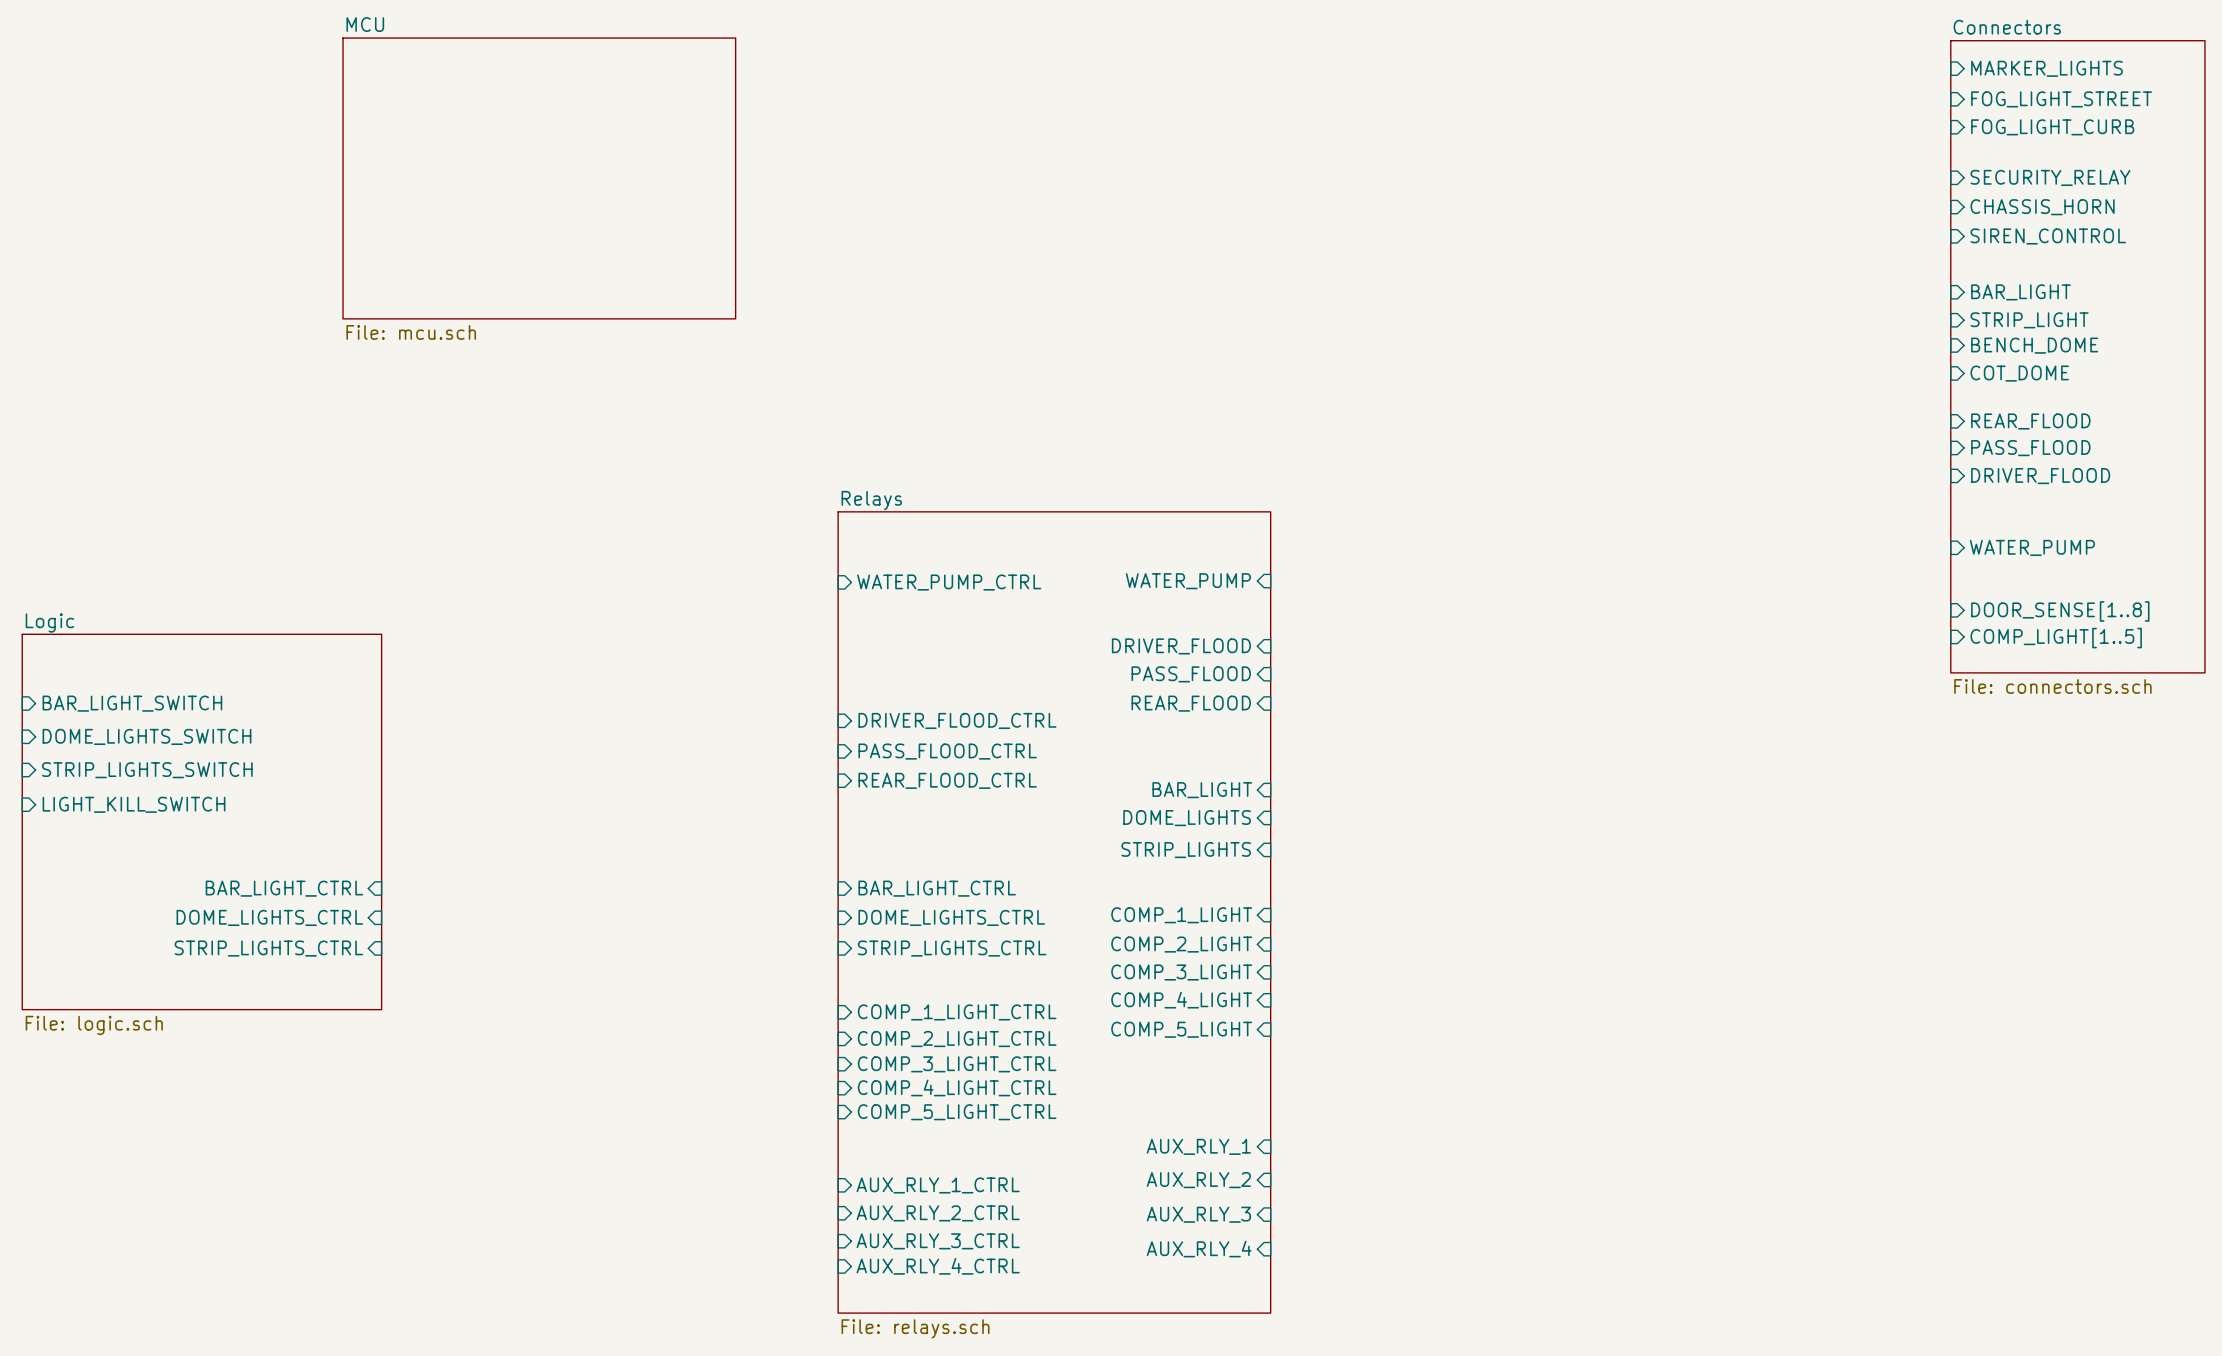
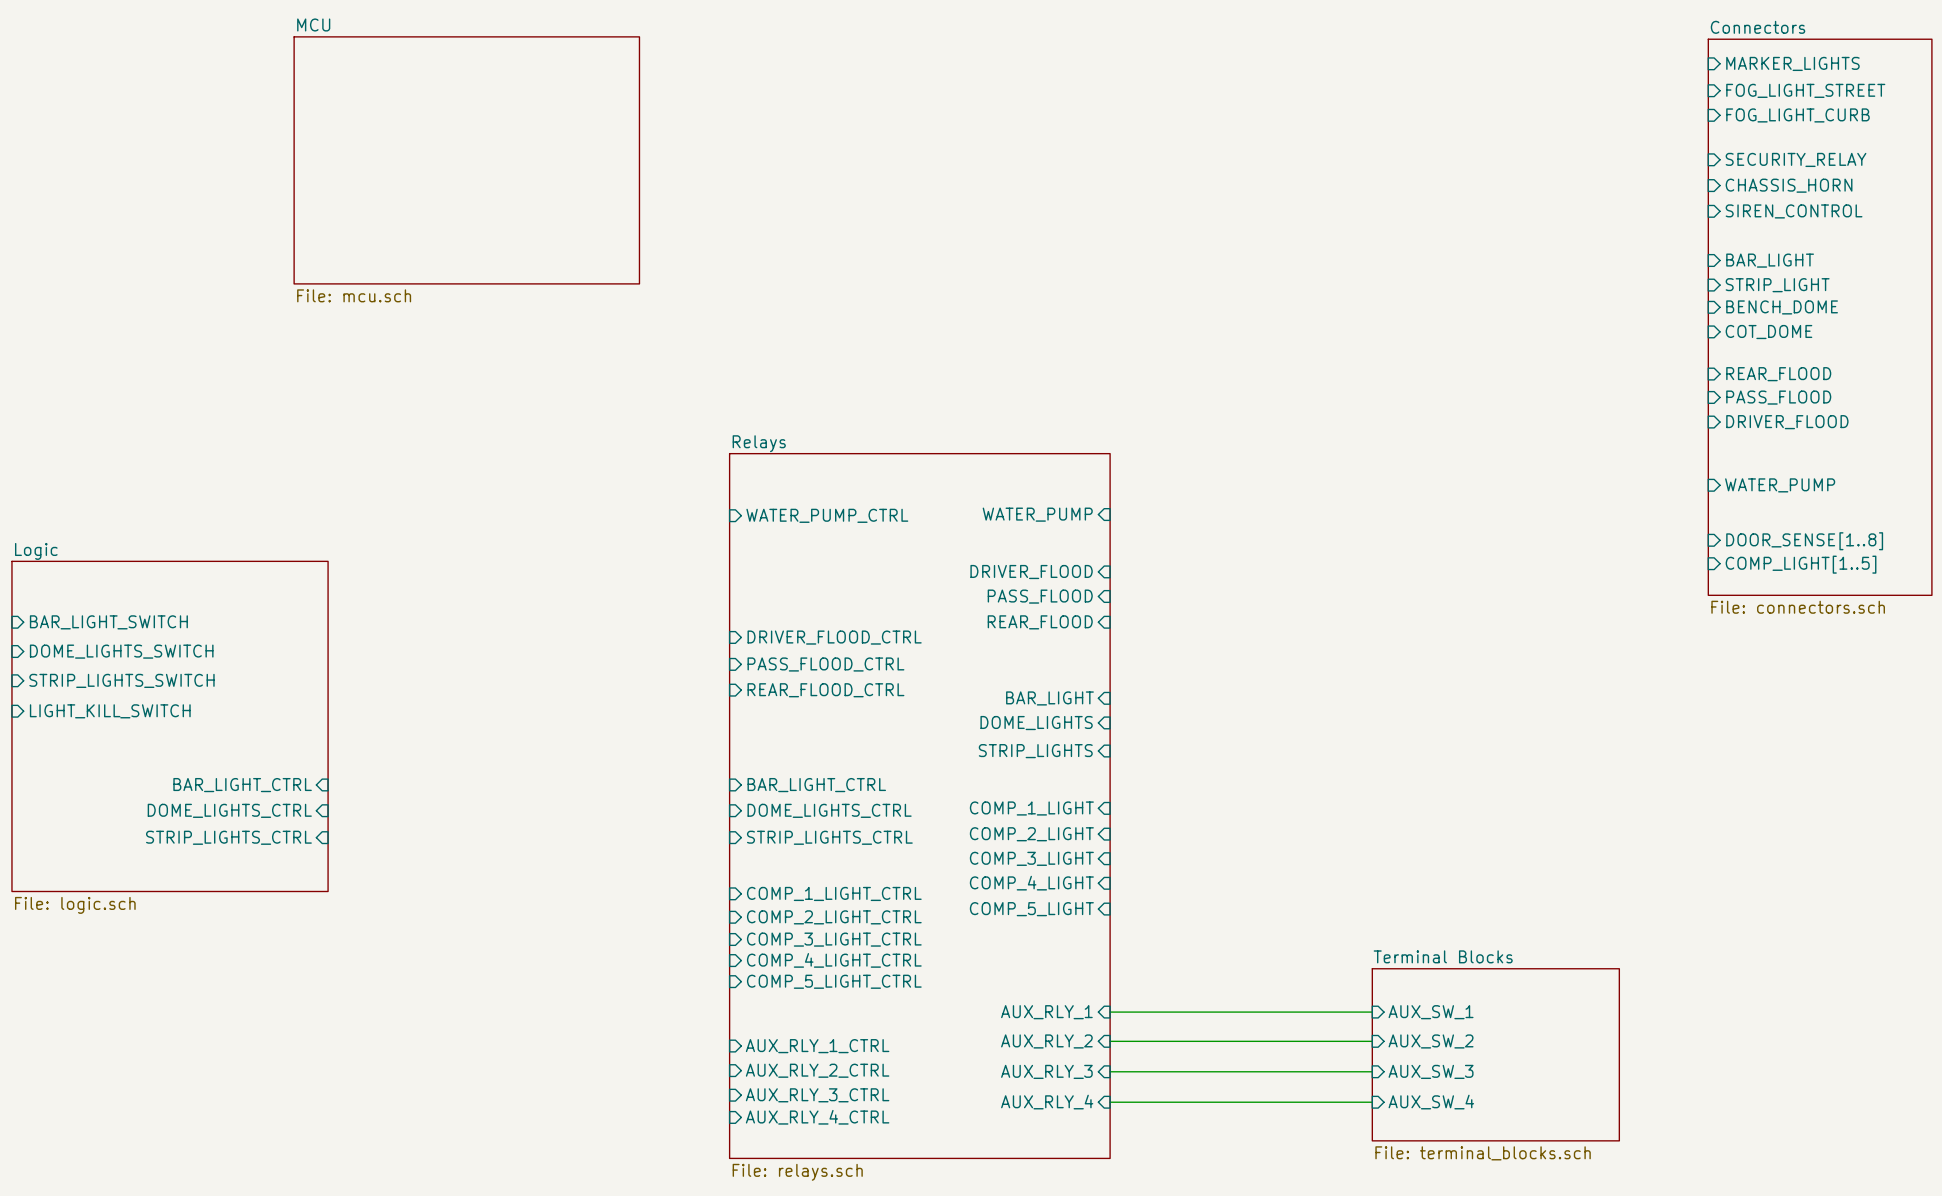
wire: none -> (1110, 1012) (1372, 1012)
sheet pin: none -> AUX_SW_1 (1431, 1012)
wire: none -> (1110, 1041) (1372, 1041)
sheet pin: none -> AUX_SW_2 (1431, 1041)
sheet Terminal Blocks: none -> File: terminal_blocks.sch (1495, 1054)
wire: none -> (1110, 1071) (1372, 1071)
sheet pin: none -> AUX_SW_3 (1431, 1071)
wire: none -> (1110, 1102) (1372, 1102)
sheet pin: none -> AUX_SW_4 (1431, 1102)

